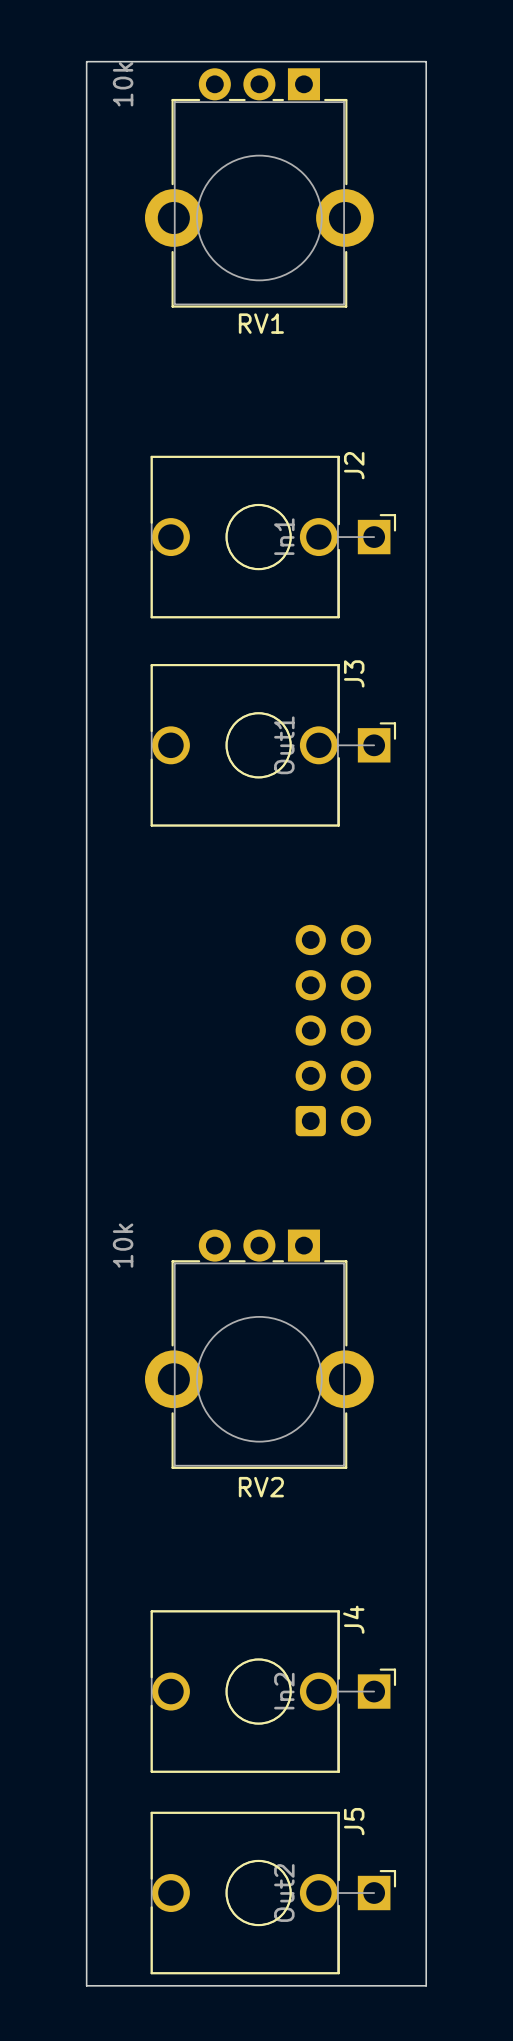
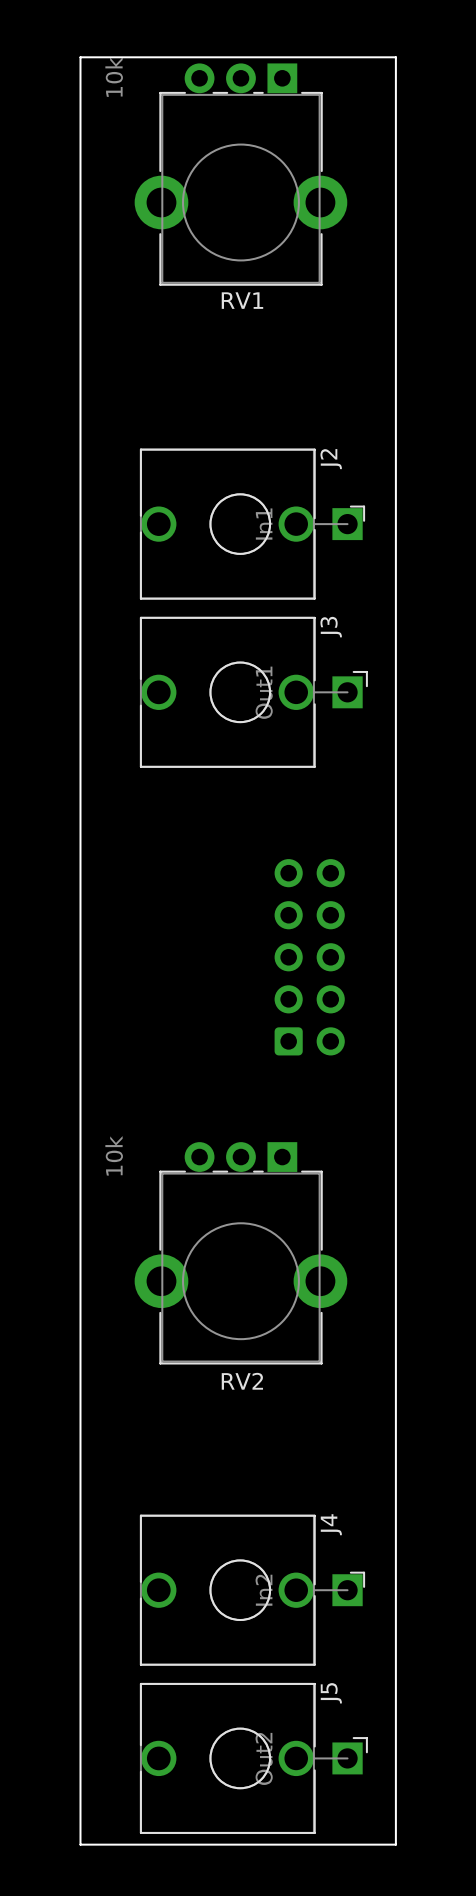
J2 footprint: [150, 455, 397, 619] -> [139, 448, 366, 600]
J4 footprint: [150, 1610, 397, 1773] -> [139, 1514, 366, 1666]

